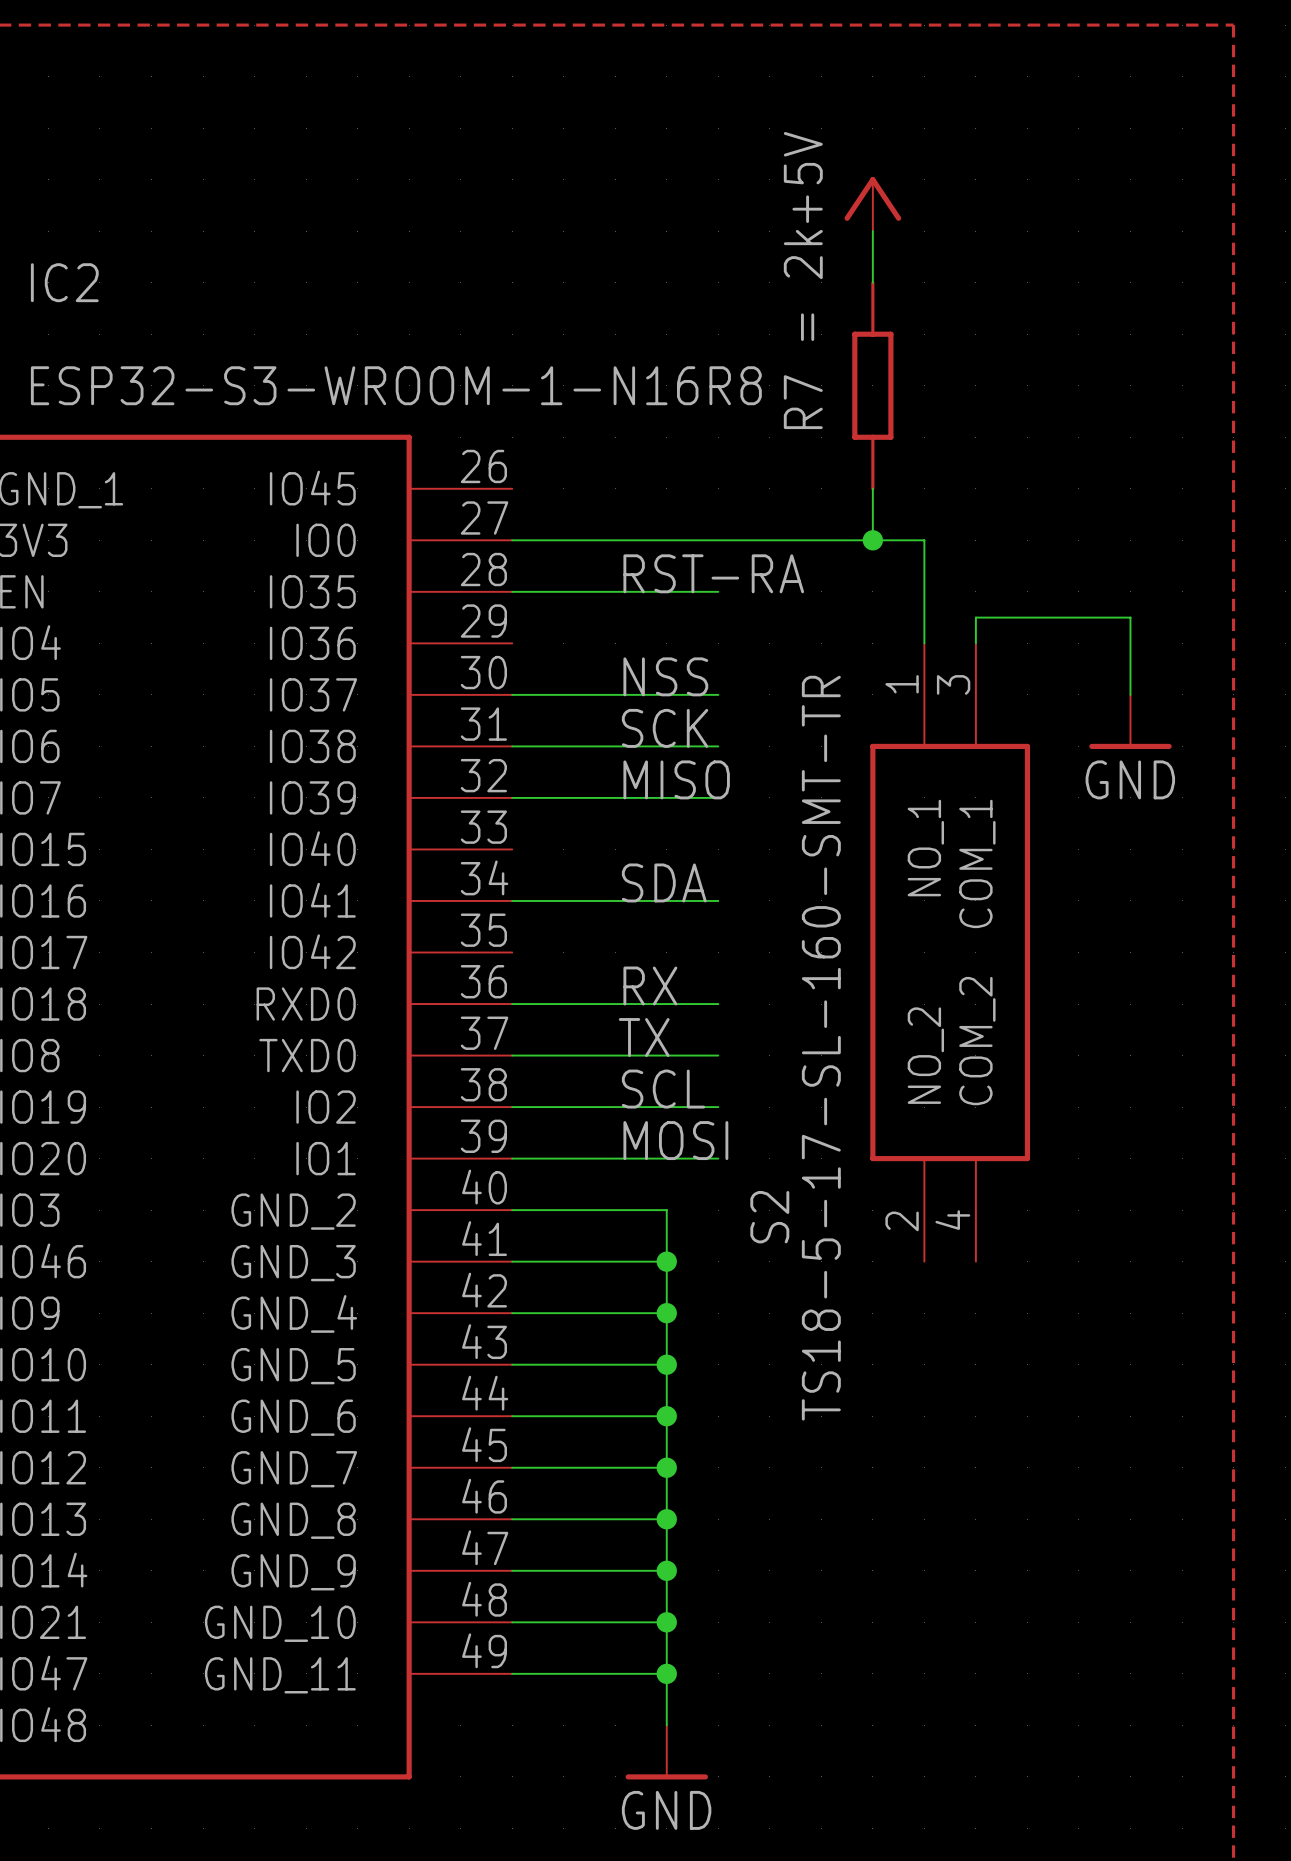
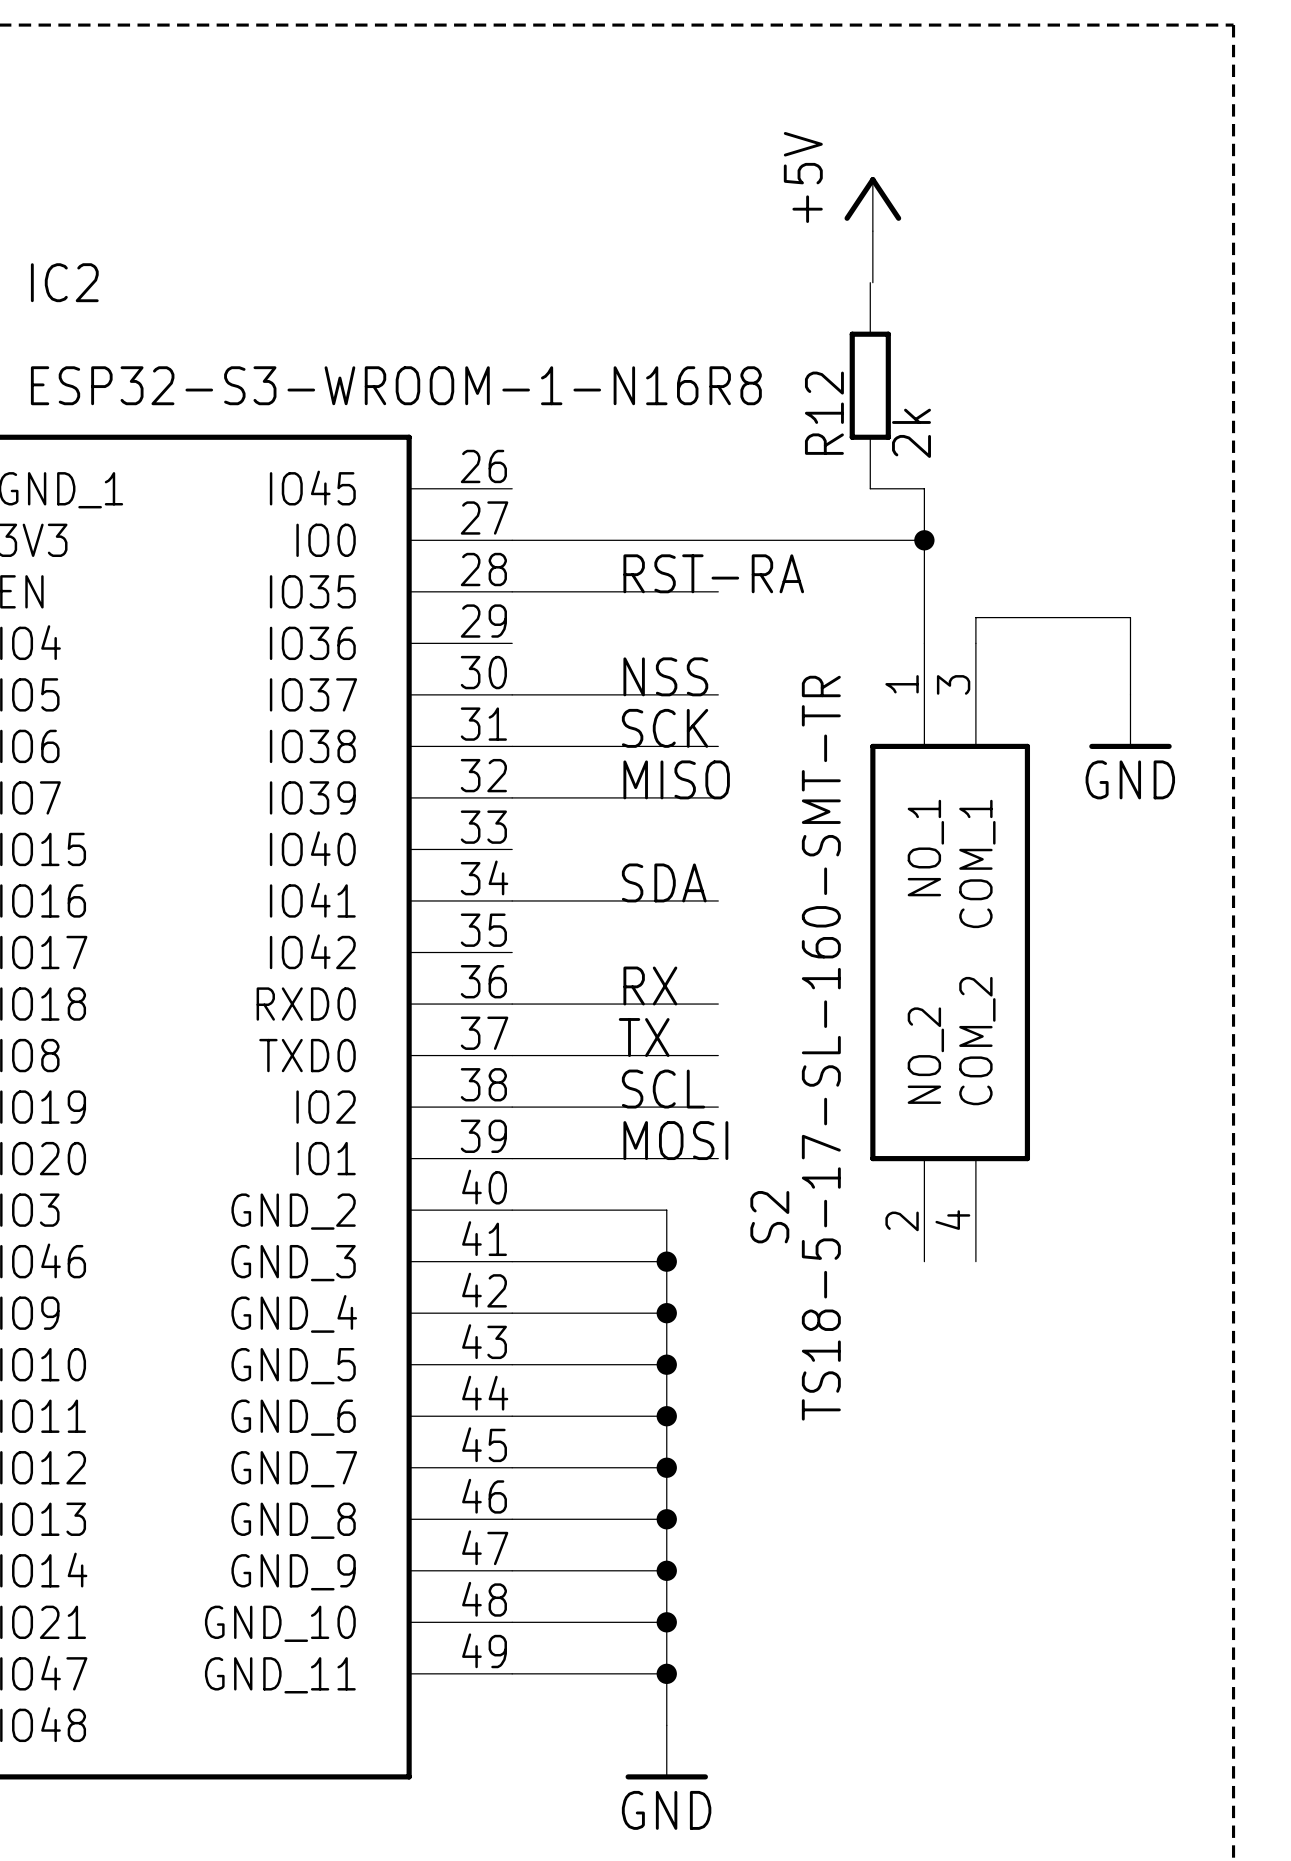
R12: none -> 2k (870, 385)
part: (872, 385) -> none
wire: none -> (870, 488) (924, 488) (924, 540)
wire: (872, 488) (872, 540) -> none
junction position: (872, 540) -> (924, 540)

